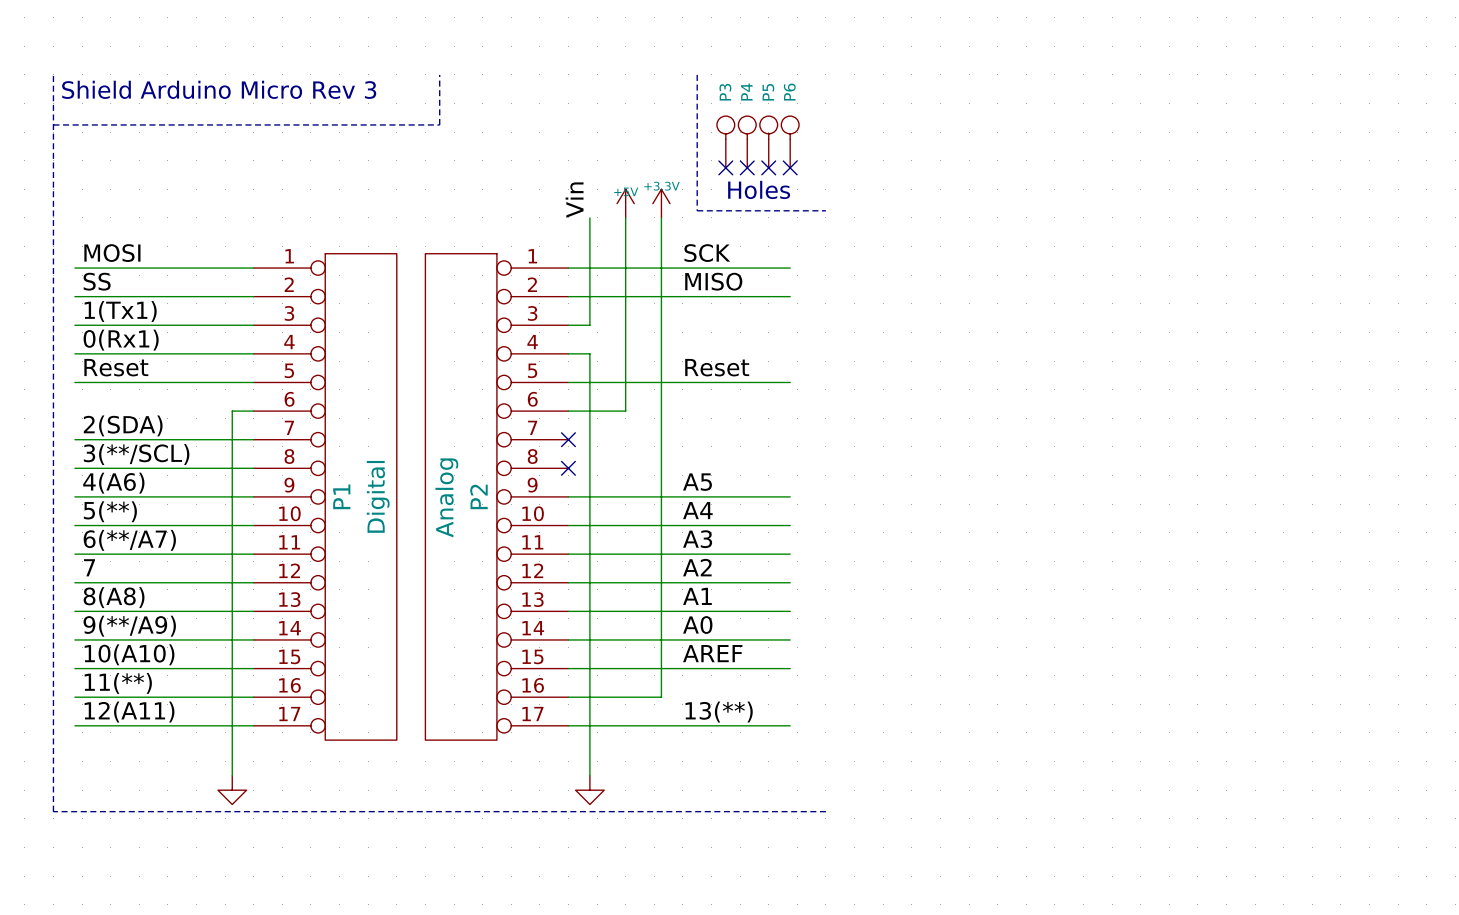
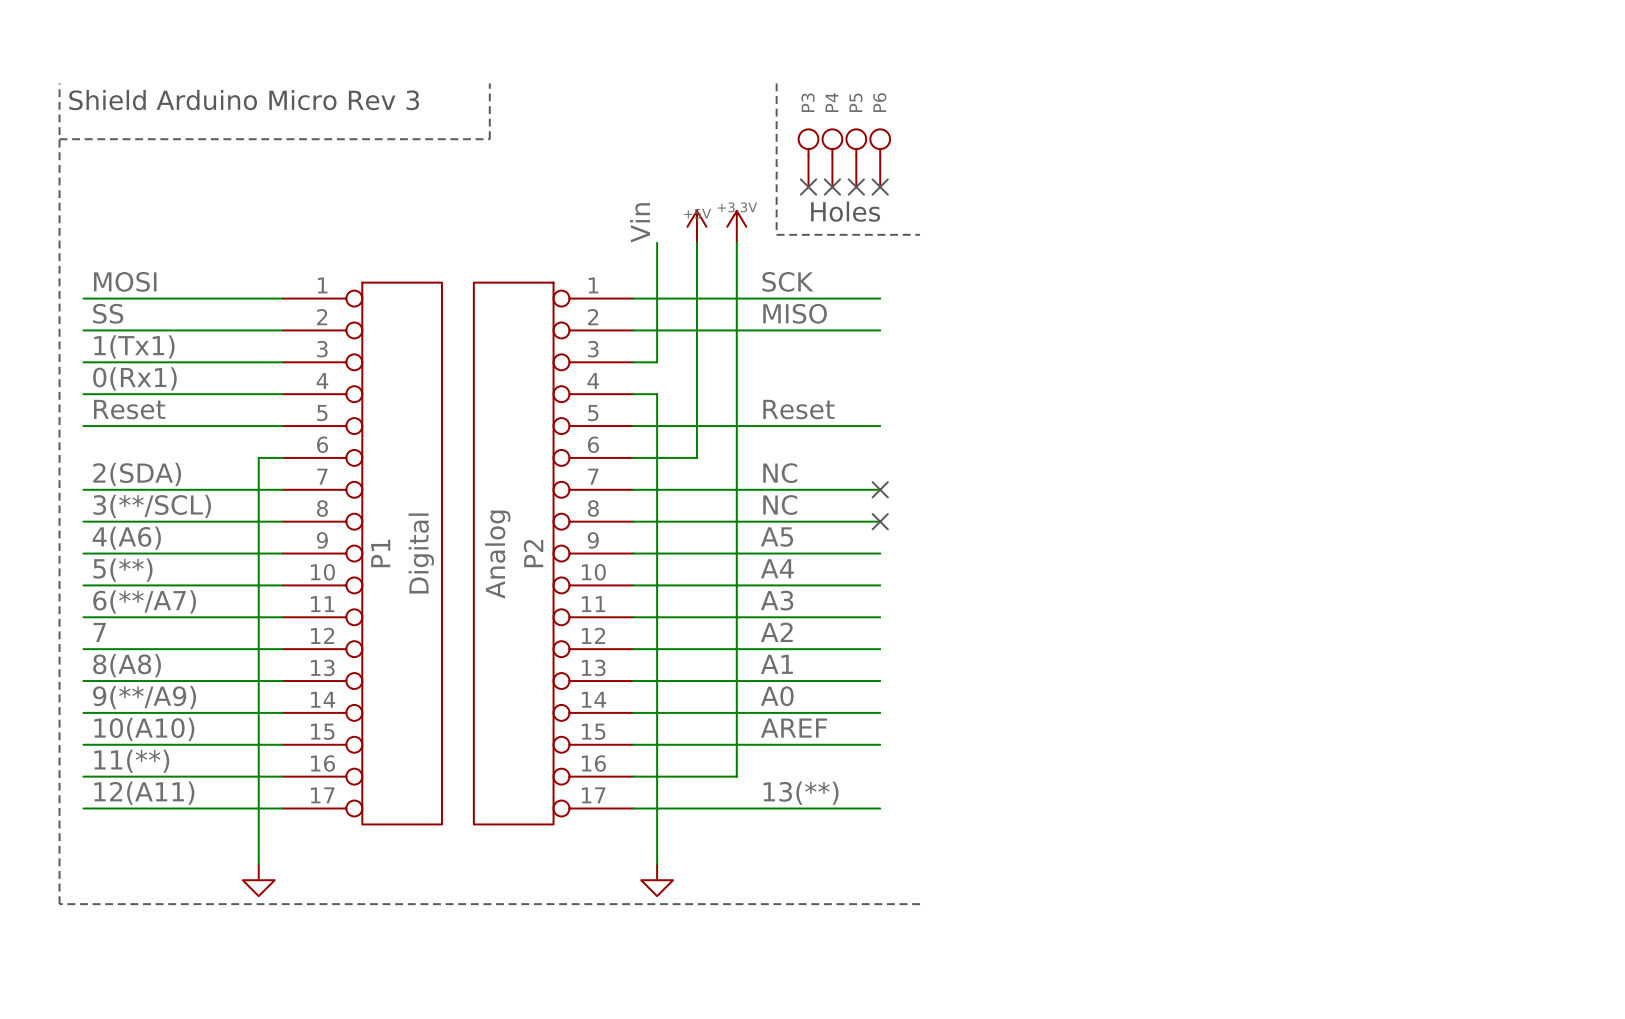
label: none -> NC (780, 473)
wire: none -> (633, 489) (880, 489)
no-connect mark: (568, 439) -> none
no-connect mark: none -> (880, 489)
label: none -> NC (780, 505)
wire: none -> (633, 521) (880, 521)
no-connect mark: (568, 468) -> none
no-connect mark: none -> (880, 521)

